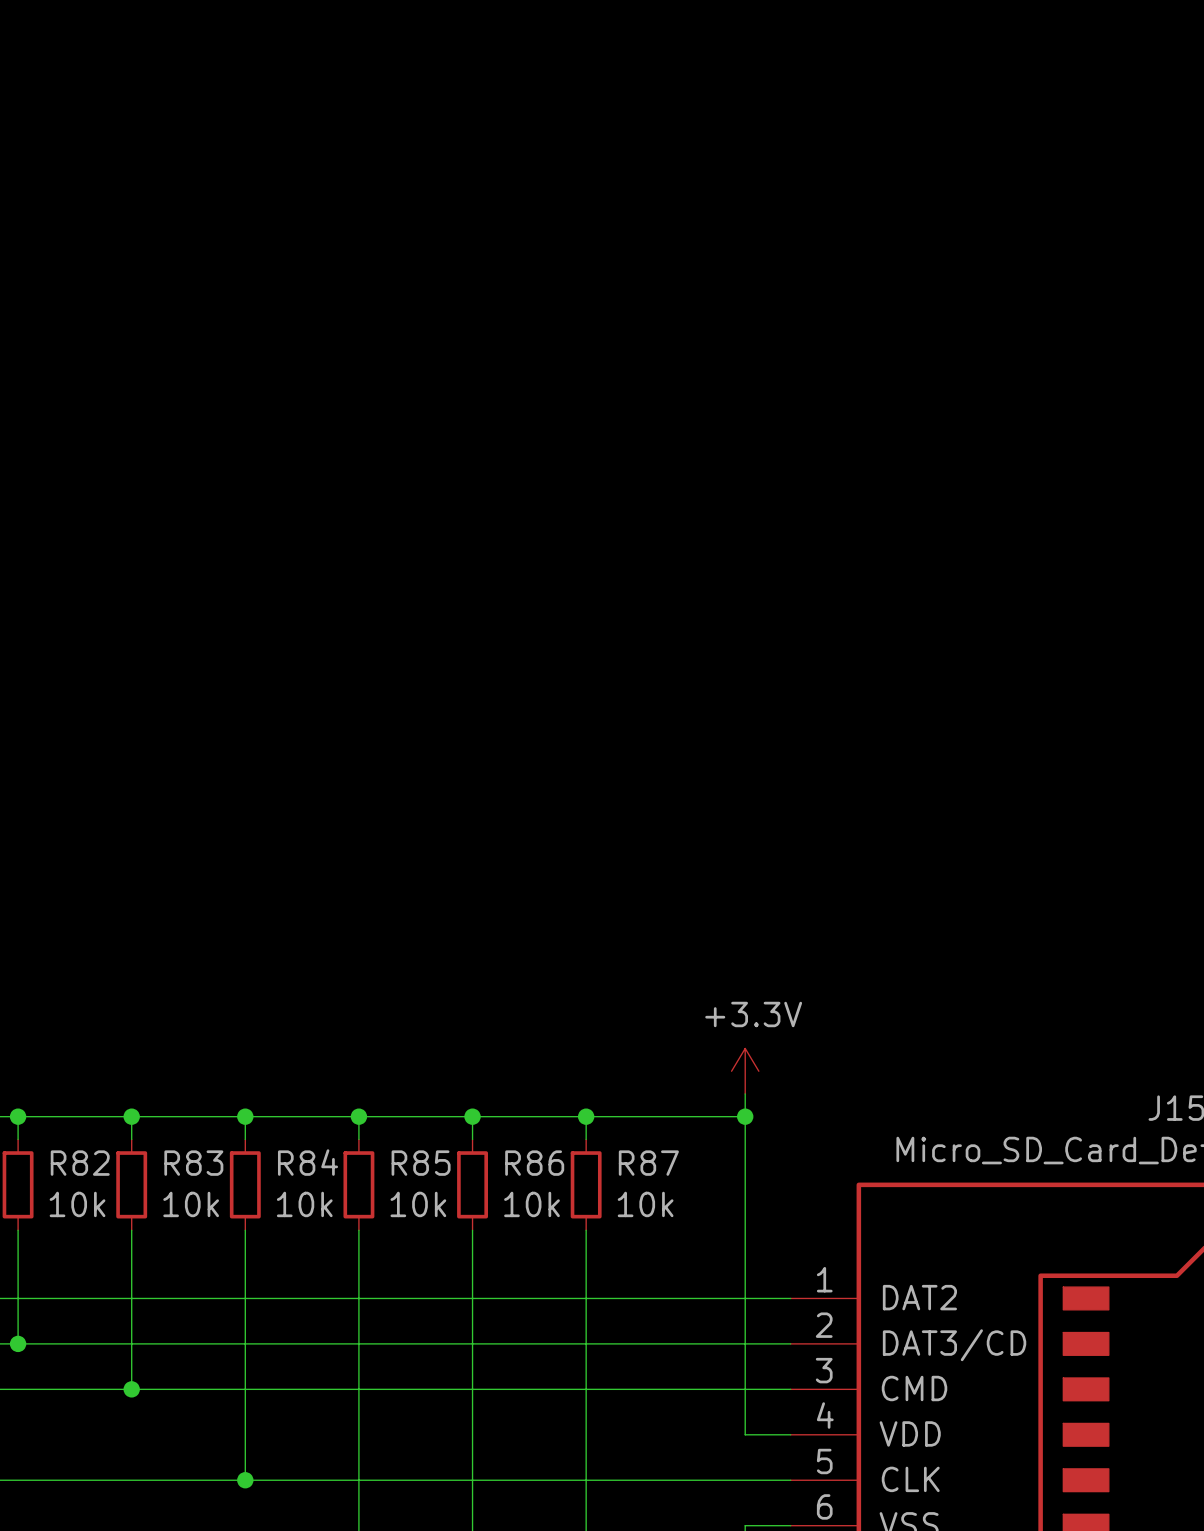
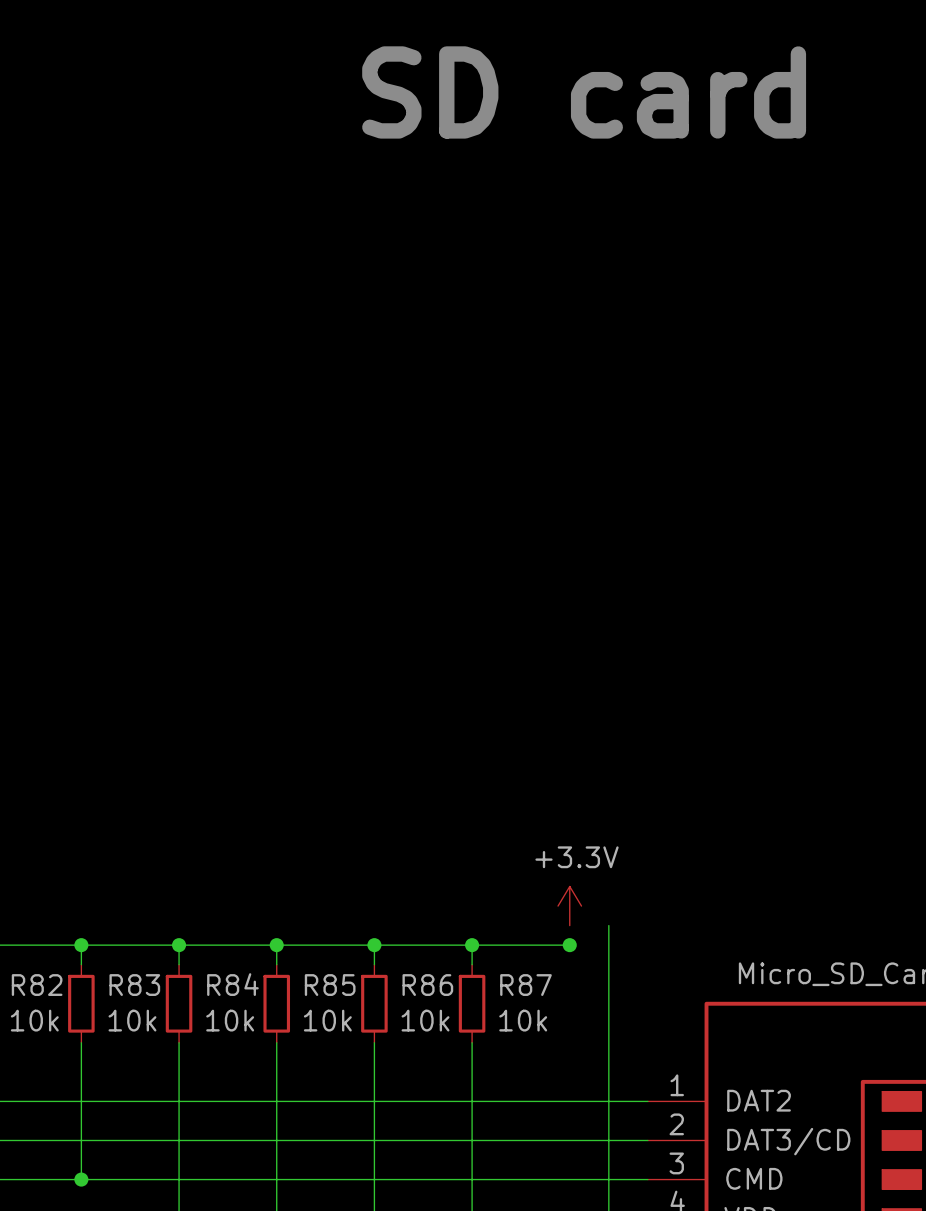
text: none -> SD card (584, 92)
power symbol position: +3.3V (745, 1071) -> +3.3V (569, 906)
wire: (699, 1116) (745, 1116) -> none
junction position: (745, 1116) -> (569, 945)

